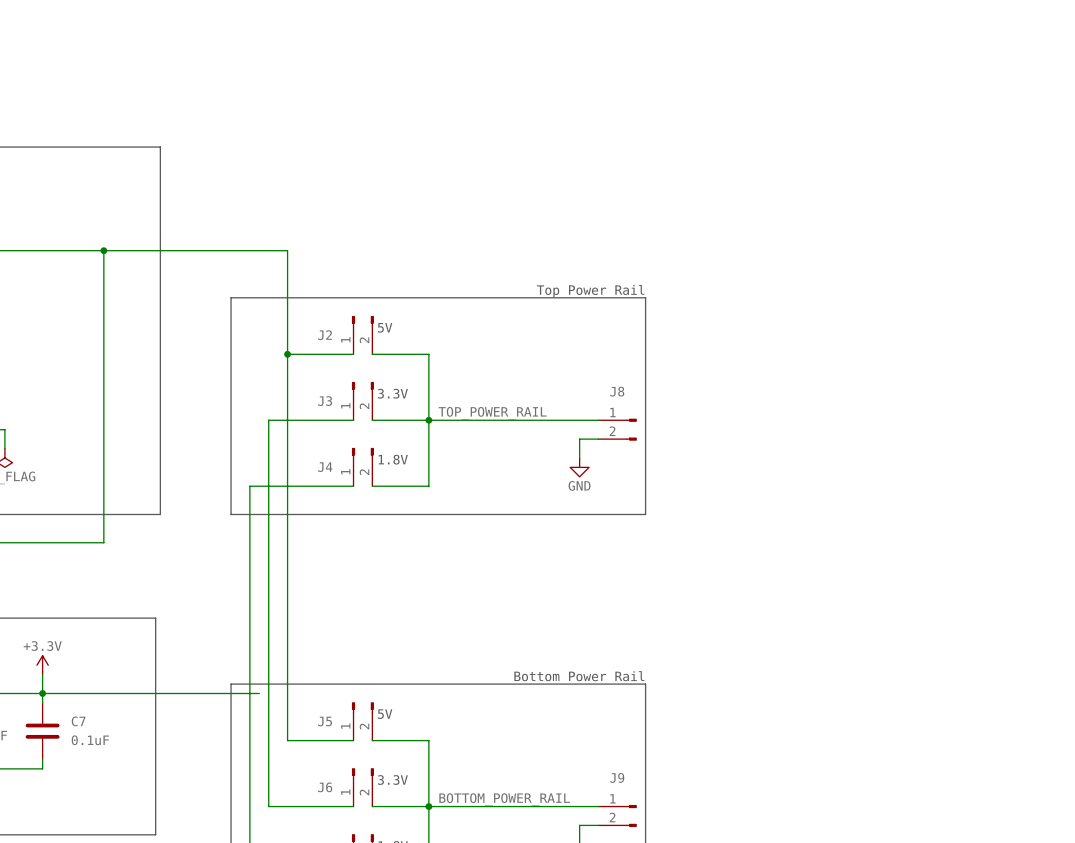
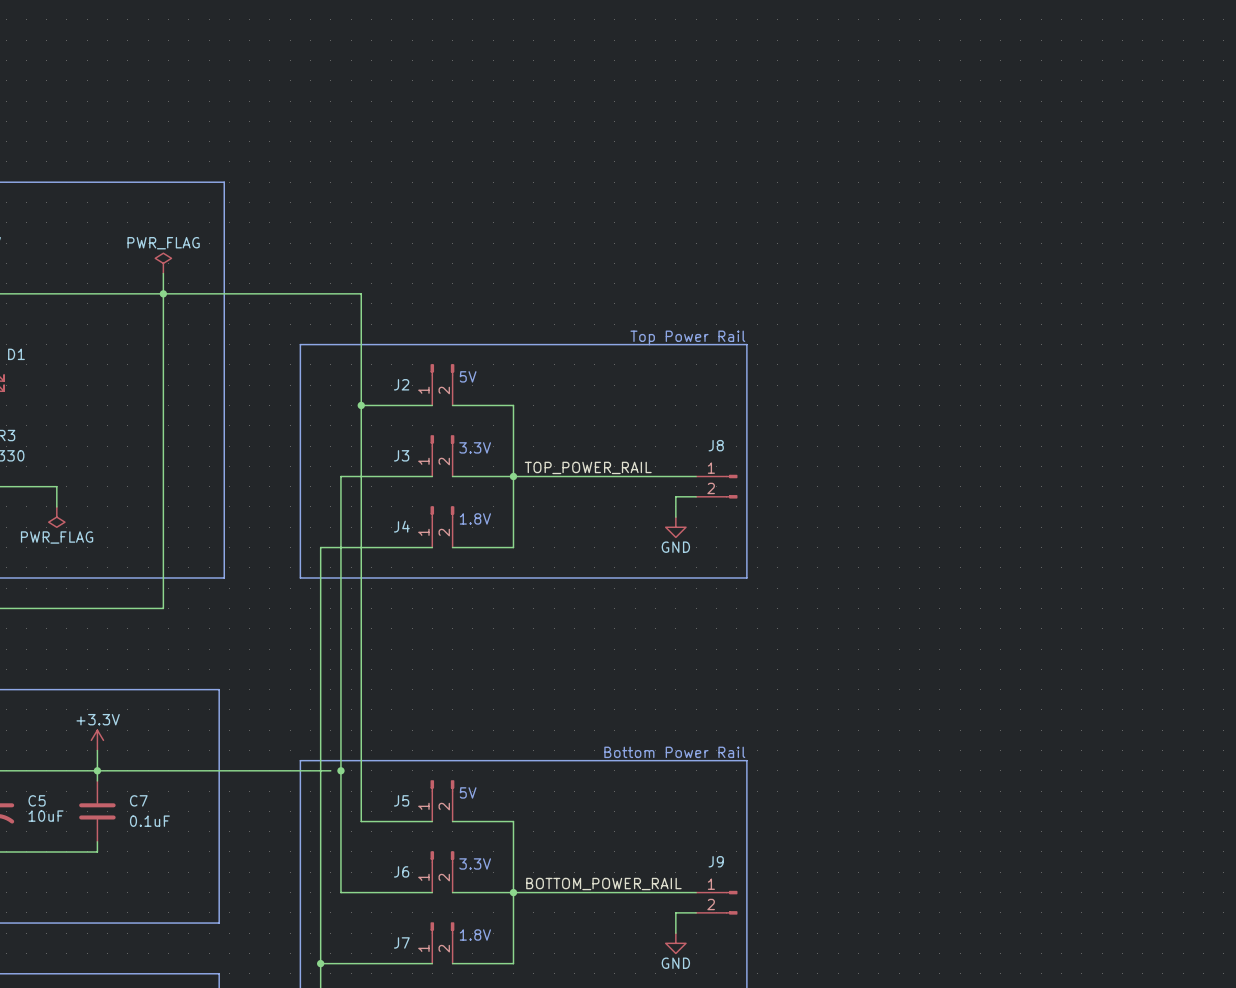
power symbol: none -> PWR_FLAG (163, 263)
wire: none -> (163, 273) (163, 293)
junction: none -> (340, 770)

